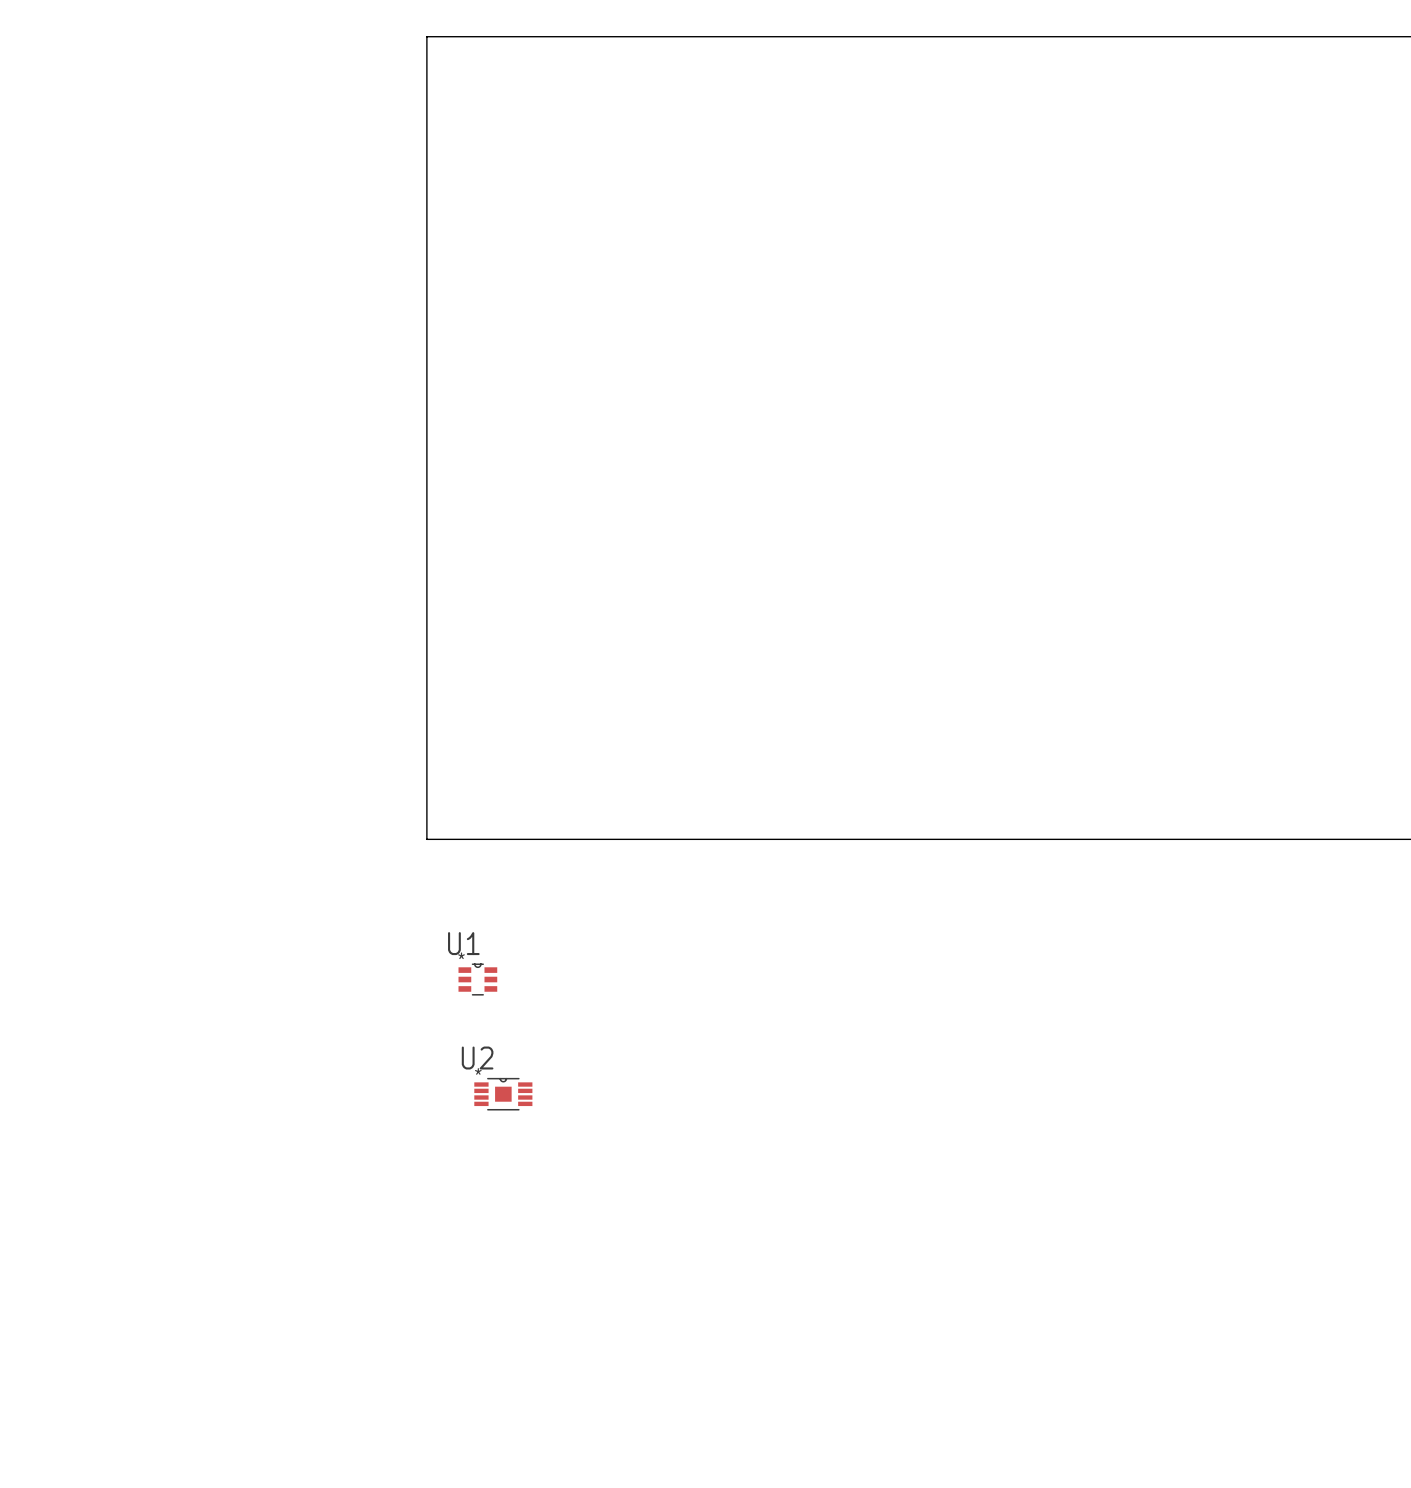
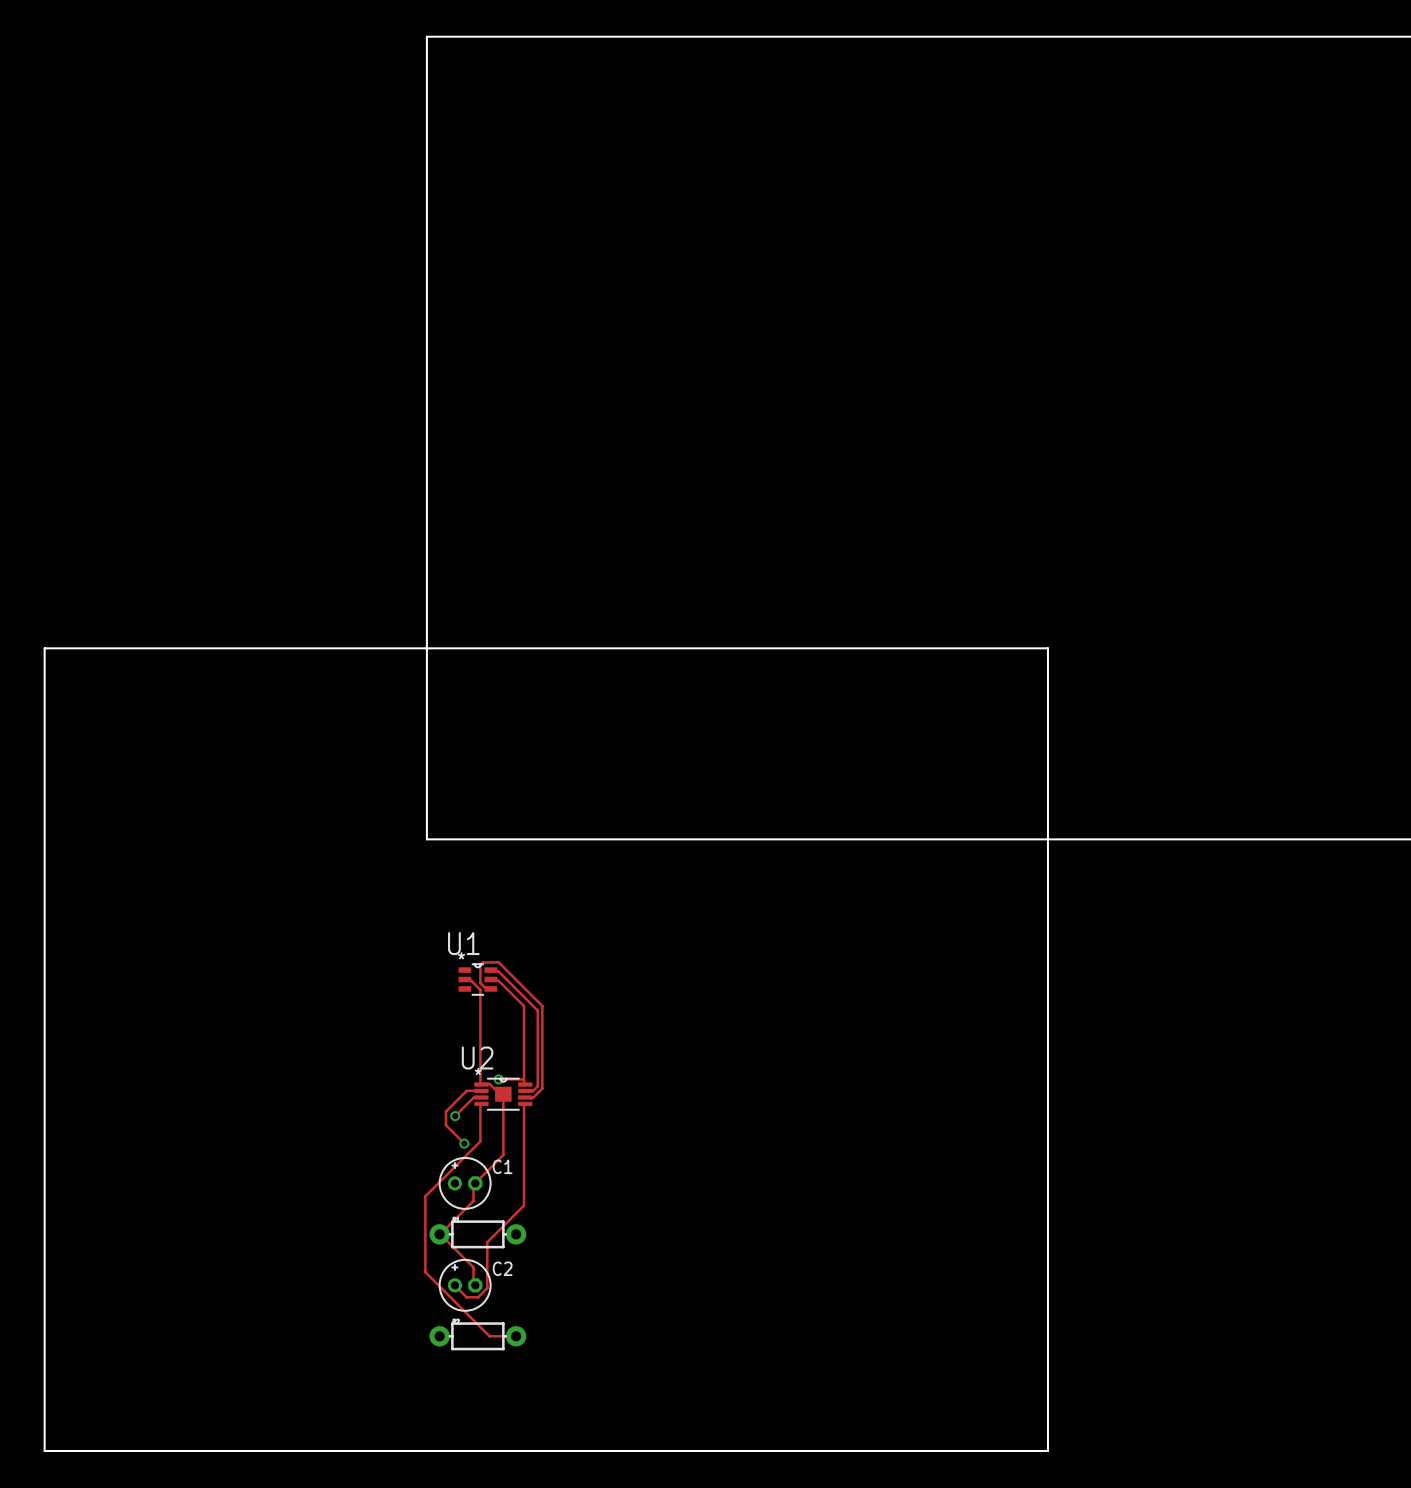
board edge: none -> (44, 648) (44, 1450) (1047, 1450) (1047, 648) (44, 648)
track: none -> (490, 970) (498, 971) (537, 1010) (537, 1086) (533, 1090) (525, 1090)
track: none -> (464, 979) (471, 980) (480, 989) (480, 1084) (489, 1084) (498, 1093) (503, 1093) (503, 1155) (473, 1184) (473, 1200) (439, 1234) (473, 1267) (473, 1283) (475, 1285)
track: none -> (490, 979) (498, 980) (523, 1006) (525, 1084)
track: none -> (490, 988) (485, 987) (480, 983) (480, 964) (482, 962) (498, 962) (542, 1006) (542, 1088) (533, 1097) (525, 1097)
track: none -> (498, 1079) (523, 1079)
via: none -> (498, 1079)
track: none -> (481, 1090) (466, 1090) (446, 1111) (446, 1125) (464, 1143)
track: none -> (481, 1097) (473, 1097) (455, 1116)
track: none -> (481, 1103) (480, 1141) (425, 1196) (425, 1272) (489, 1336) (516, 1336)
track: none -> (525, 1103) (523, 1205) (487, 1242) (487, 1288) (478, 1297) (466, 1297) (454, 1285)
via: none -> (455, 1116)
via: none -> (464, 1143)
C1: none -> (465, 1183)
part: none -> (477, 1234)
C2: none -> (465, 1285)
part: none -> (477, 1336)

